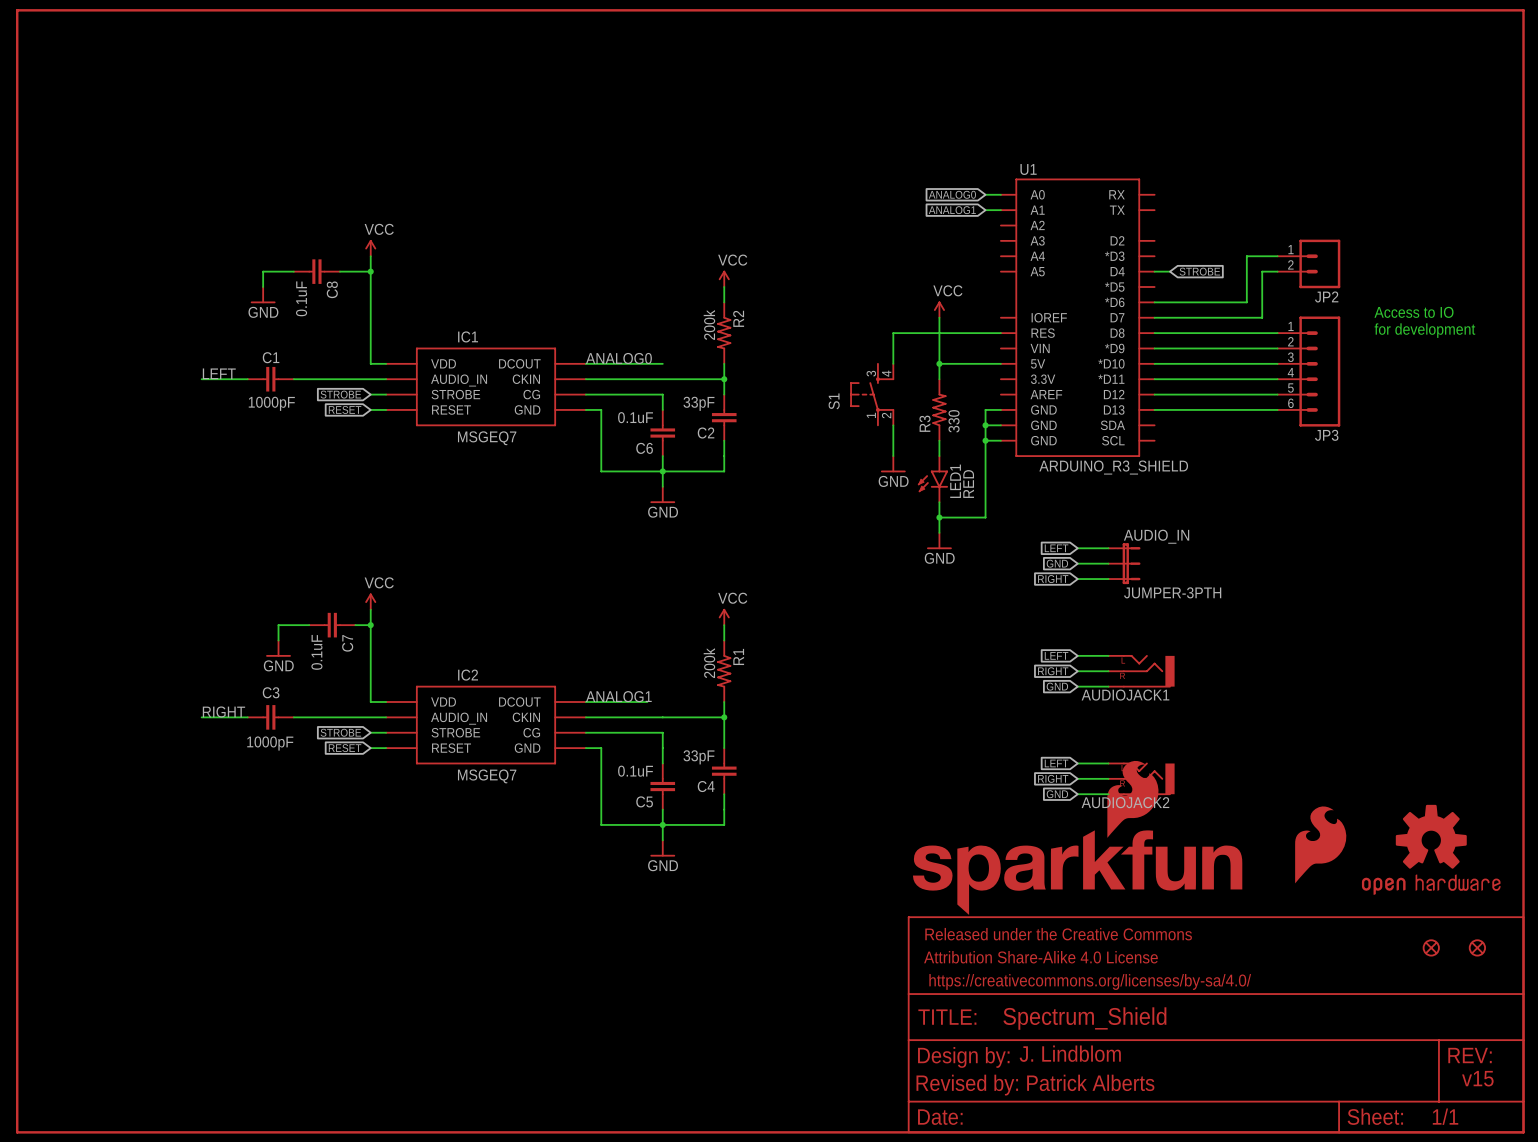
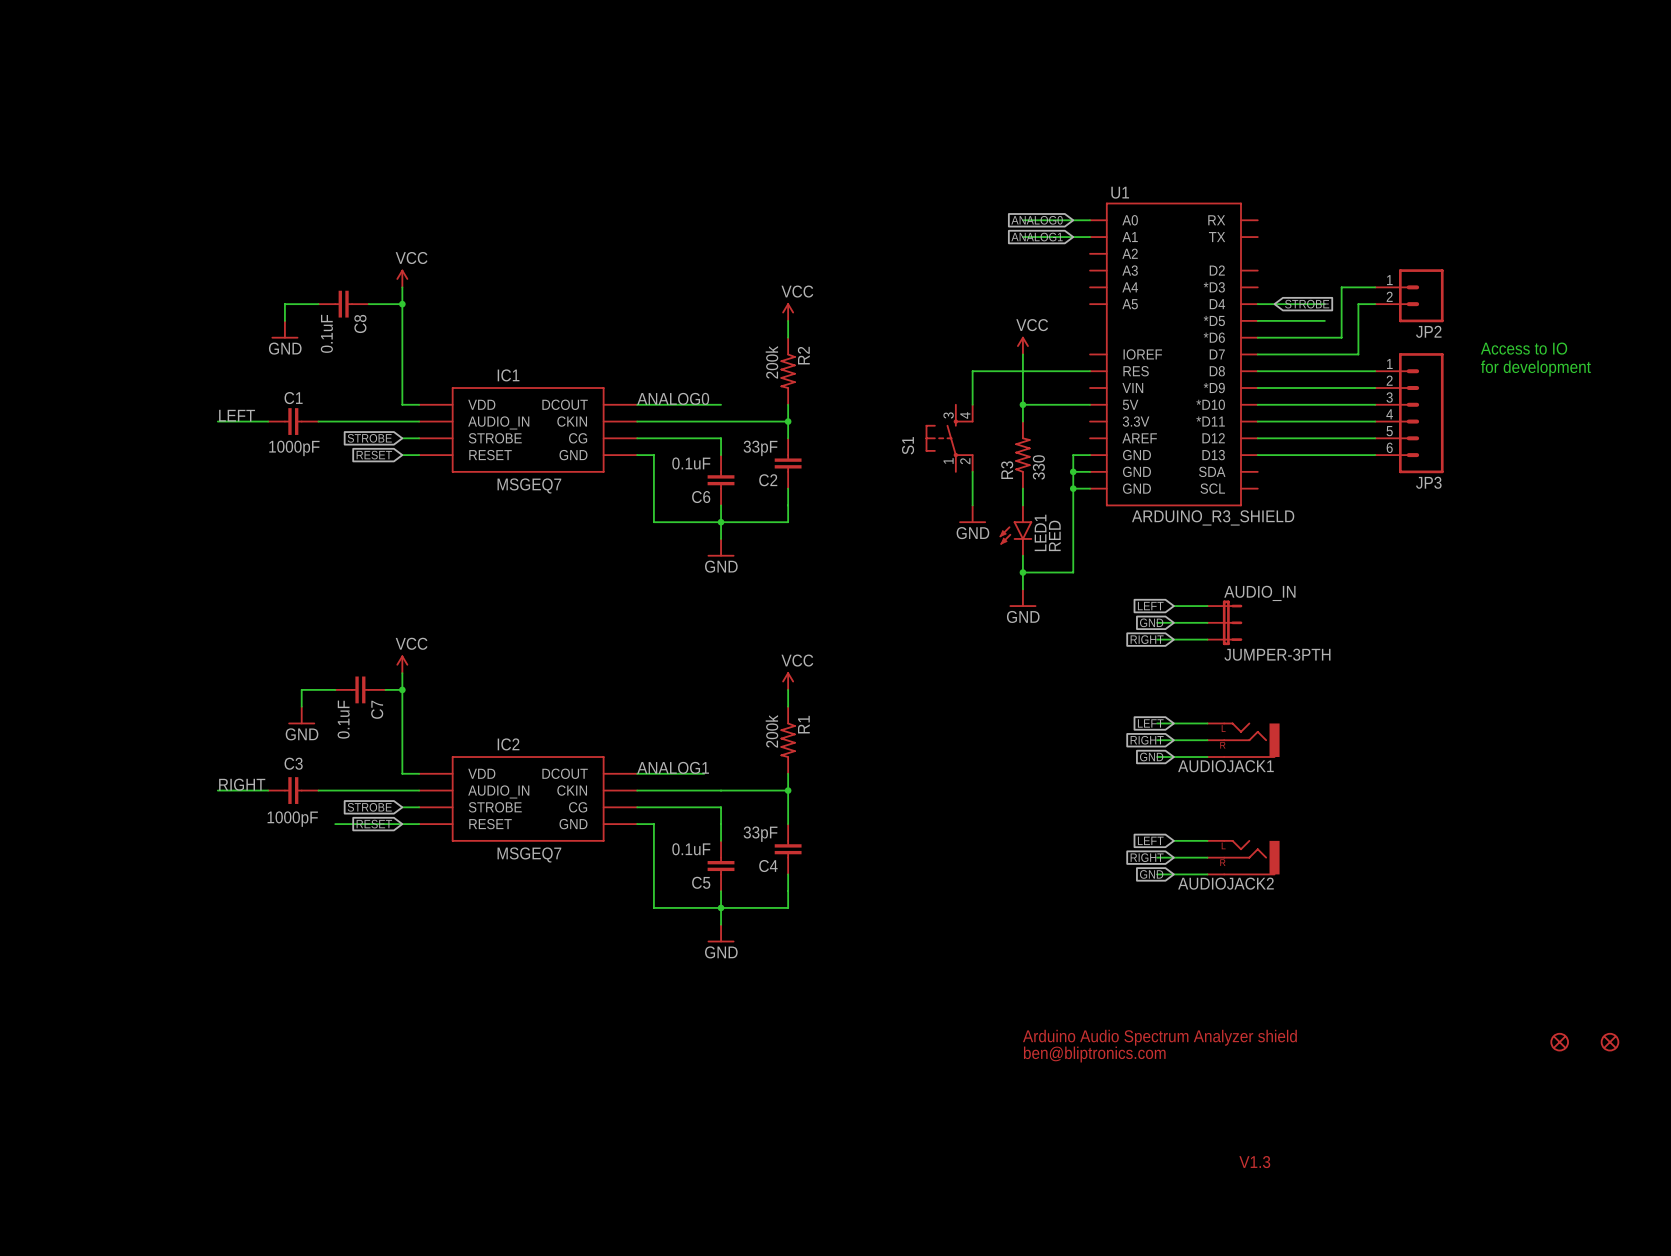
wire: none -> (1022, 220) (1073, 220)
wire: none -> (1022, 237) (1073, 237)
wire: (1246, 256) (1246, 271) -> (1375, 304) (1358, 304)
wire: none -> (1358, 287) (1341, 287) (1341, 337)
JP2 position: (1308, 263) -> (1409, 295)
wire: none -> (1274, 304) (1324, 304)
wire: (1277, 271) (1262, 271) (1262, 317) (1246, 317) -> none
wire: none -> (1257, 320) (1324, 320)
wire: (1231, 302) (1246, 302) -> (1358, 354) (1358, 337)
text position: Access to IO (1413, 312) -> Access to IO (1524, 348)
text position: for development (1424, 330) -> for development (1535, 368)
JP3 position: (1308, 371) -> (1409, 413)
wire: none -> (1157, 622) (1173, 622)
part: (770, 571) -> none
wire: none -> (1157, 639) (1173, 639)
wire: none -> (1157, 723) (1173, 723)
wire: none -> (1157, 740) (1173, 740)
wire: none -> (1157, 757) (1173, 757)
wire: none -> (335, 824) (402, 824)
wire: none -> (1157, 857) (1173, 857)
wire: none -> (1157, 874) (1173, 874)
part: (1077, 837) -> none
part: (1320, 844) -> none
part: (1431, 849) -> none
text: none -> Arduino Audio Spectrum Analyzer shield (1159, 1037)
text: none -> ben@bliptronics.com (1094, 1054)
part: (1216, 1024) -> none
text: J. Lindblom (1070, 1053) -> none
text: none -> V1.3 (1254, 1162)
text: v15 (1477, 1078) -> none
text: Revised by: Patrick Alberts (1035, 1085) -> none

